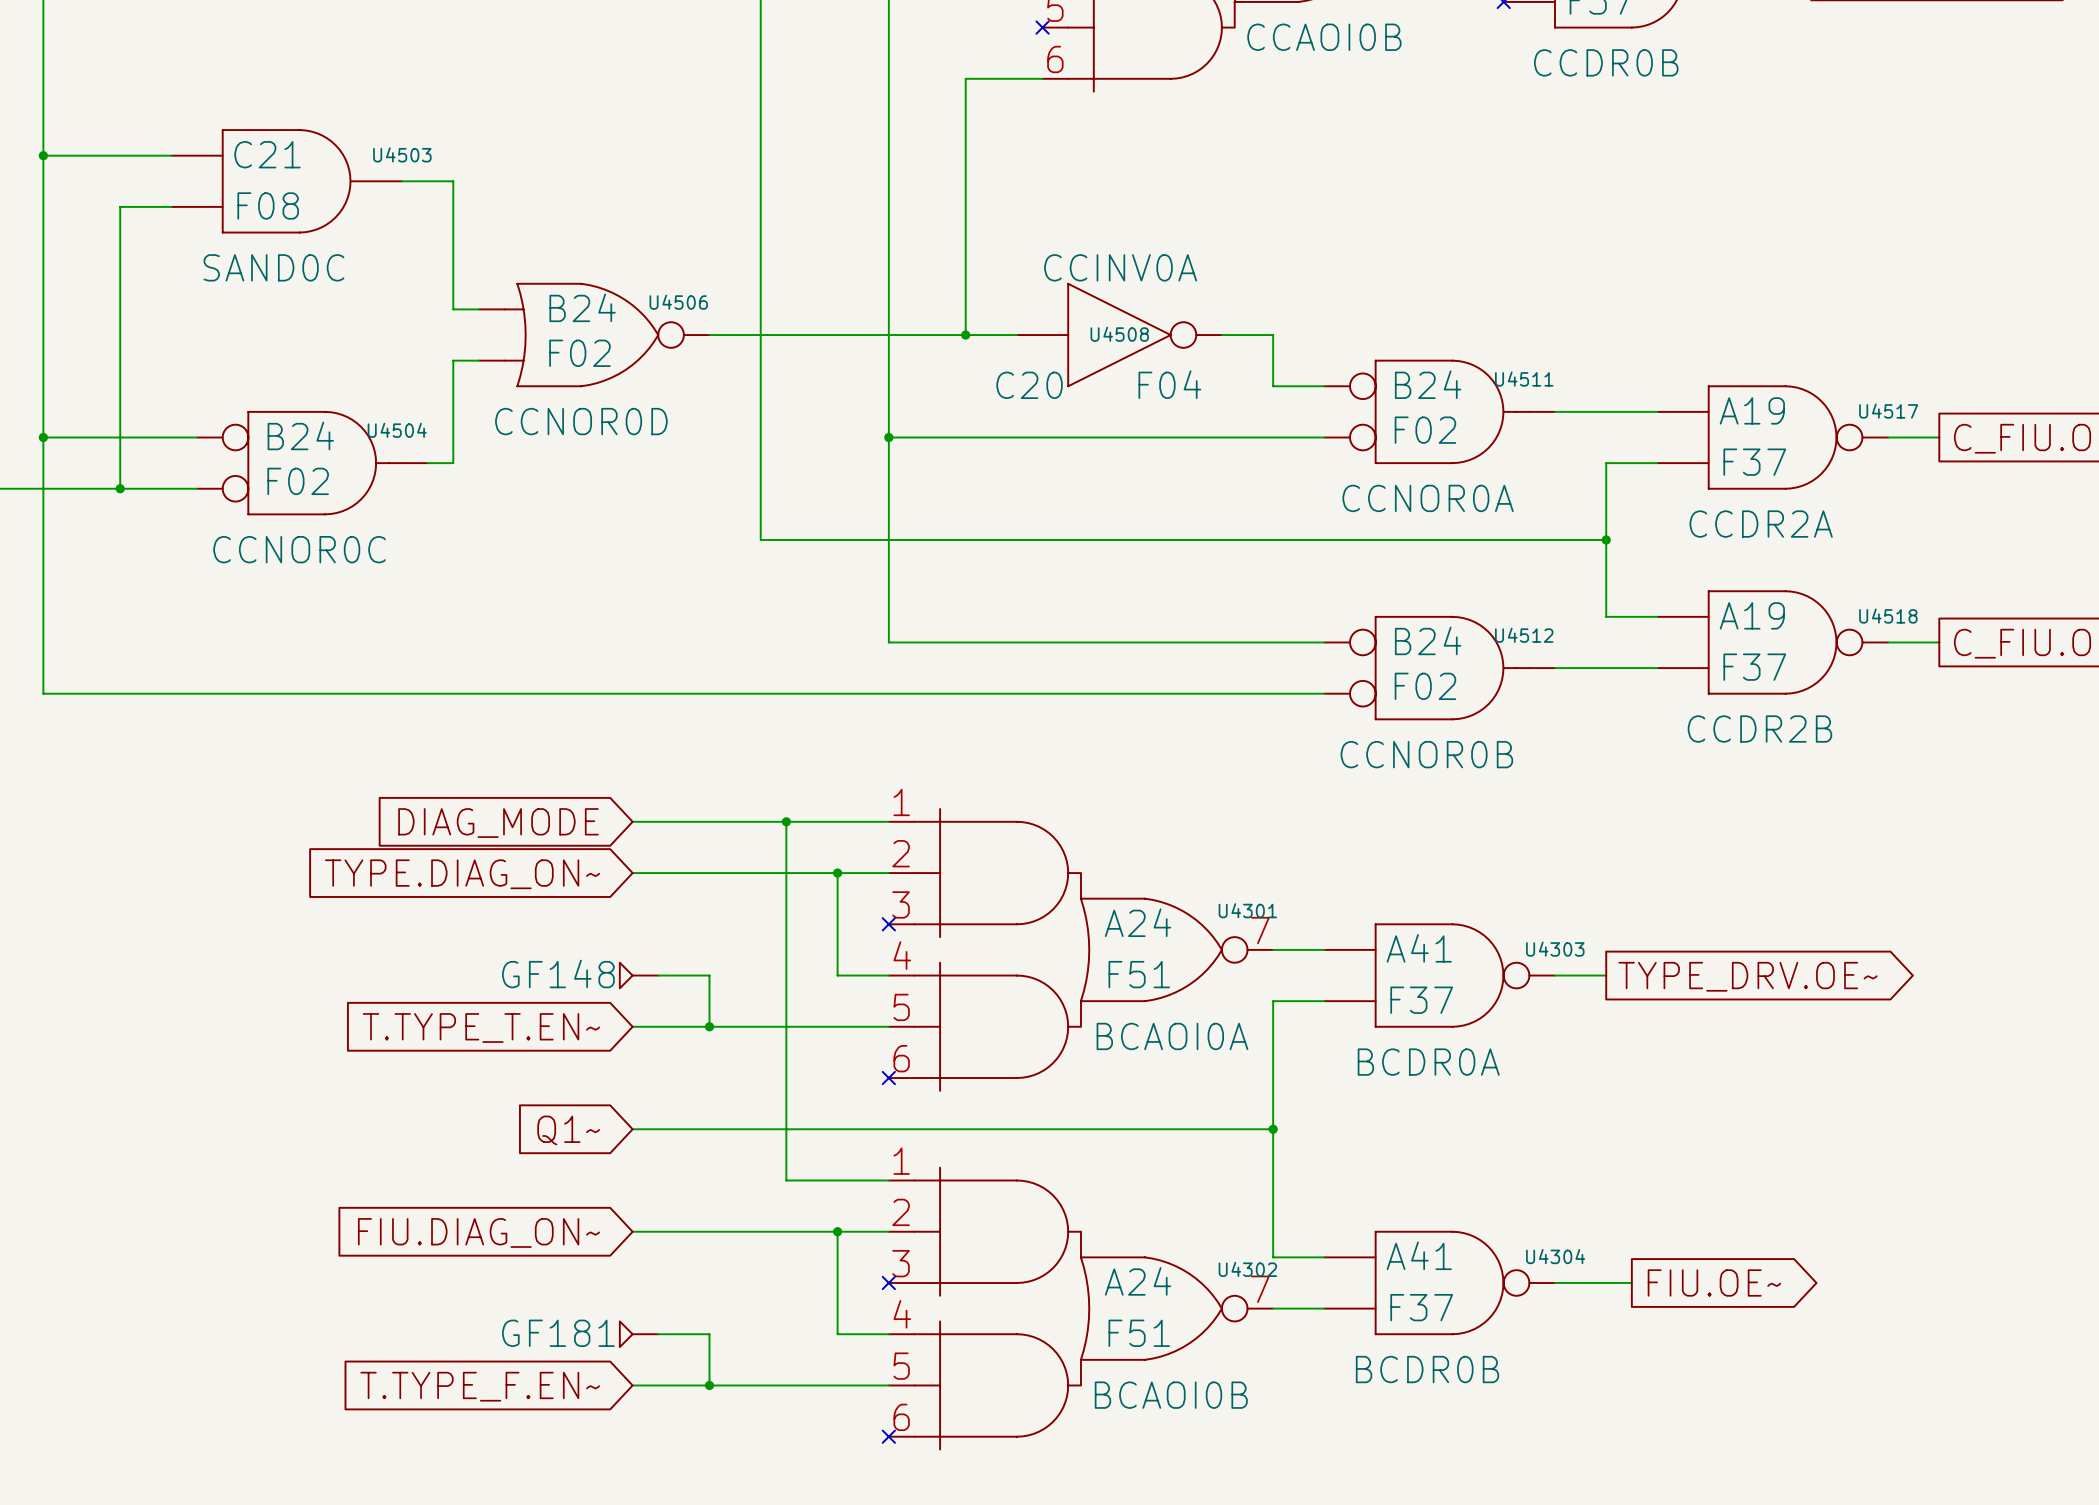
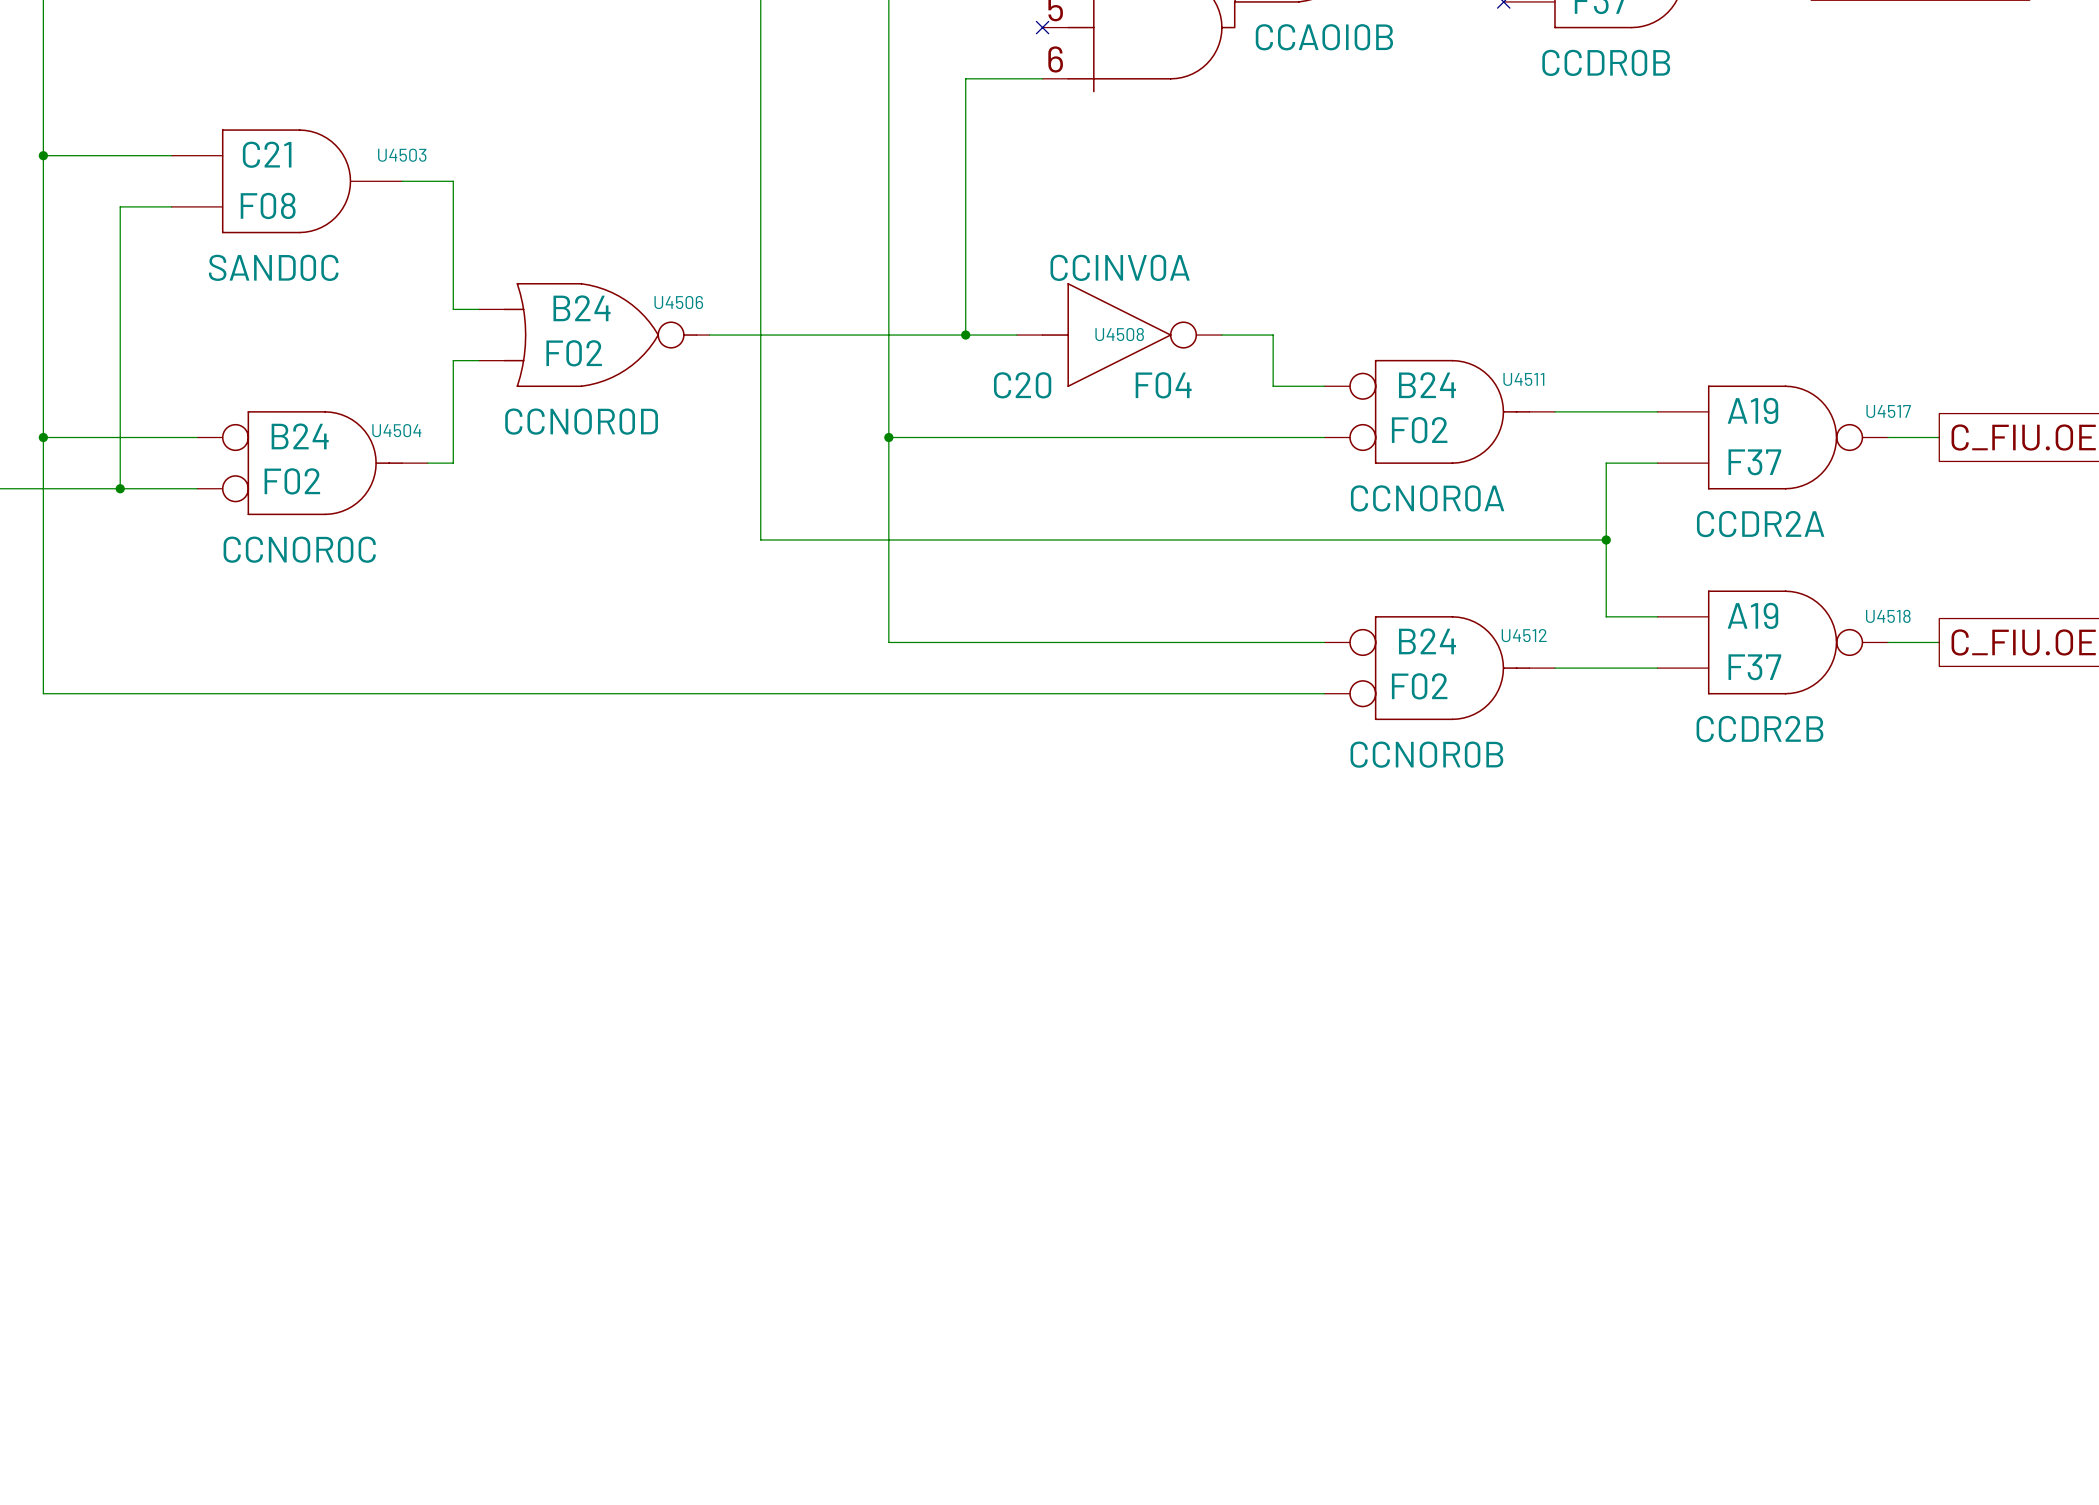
wire: (632, 821) (888, 821) -> none
wire: (786, 821) (786, 1180) (888, 1180) -> none
junction: (786, 821) -> none
global label: DIAG_MODE (498, 823) -> none
wire: (632, 873) (888, 873) -> none
wire: (837, 873) (837, 975) (888, 975) -> none
junction: (837, 873) -> none
global label: TYPE.DIAG_ON~ (462, 874) -> none
no-connect mark: (888, 924) -> none
U4301: F51 (1081, 949) -> none
wire: (1273, 949) (1324, 949) -> none
GF148: (638, 975) -> none
wire: (658, 975) (709, 975) (709, 1026) -> none
U4303: F37 (1439, 975) -> none
wire: (1554, 975) (1606, 975) -> none
global label: TYPE_DRV.OE~ (1748, 976) -> none
wire: (1324, 1001) (1273, 1001) (1273, 1257) (1324, 1257) -> none
wire: (632, 1026) (888, 1026) -> none
junction: (709, 1026) -> none
global label: T.TYPE_T.EN~ (481, 1028) -> none
no-connect mark: (888, 1078) -> none
wire: (632, 1129) (1273, 1129) -> none
junction: (1273, 1129) -> none
global label: Q1~ (568, 1130) -> none
wire: (632, 1231) (888, 1231) -> none
wire: (837, 1231) (837, 1334) (888, 1334) -> none
junction: (837, 1231) -> none
global label: FIU.DIAG_ON~ (478, 1232) -> none
no-connect mark: (888, 1282) -> none
U4304: F37 (1439, 1282) -> none
wire: (1554, 1282) (1631, 1282) -> none
global label: FIU.OE~ (1714, 1282) -> none
U4302: F51 (1081, 1308) -> none
wire: (1273, 1308) (1324, 1308) -> none
GF181: (638, 1334) -> none
wire: (658, 1334) (709, 1334) (709, 1385) -> none
wire: (632, 1385) (888, 1385) -> none
junction: (709, 1385) -> none
global label: T.TYPE_F.EN~ (480, 1386) -> none
no-connect mark: (888, 1436) -> none

